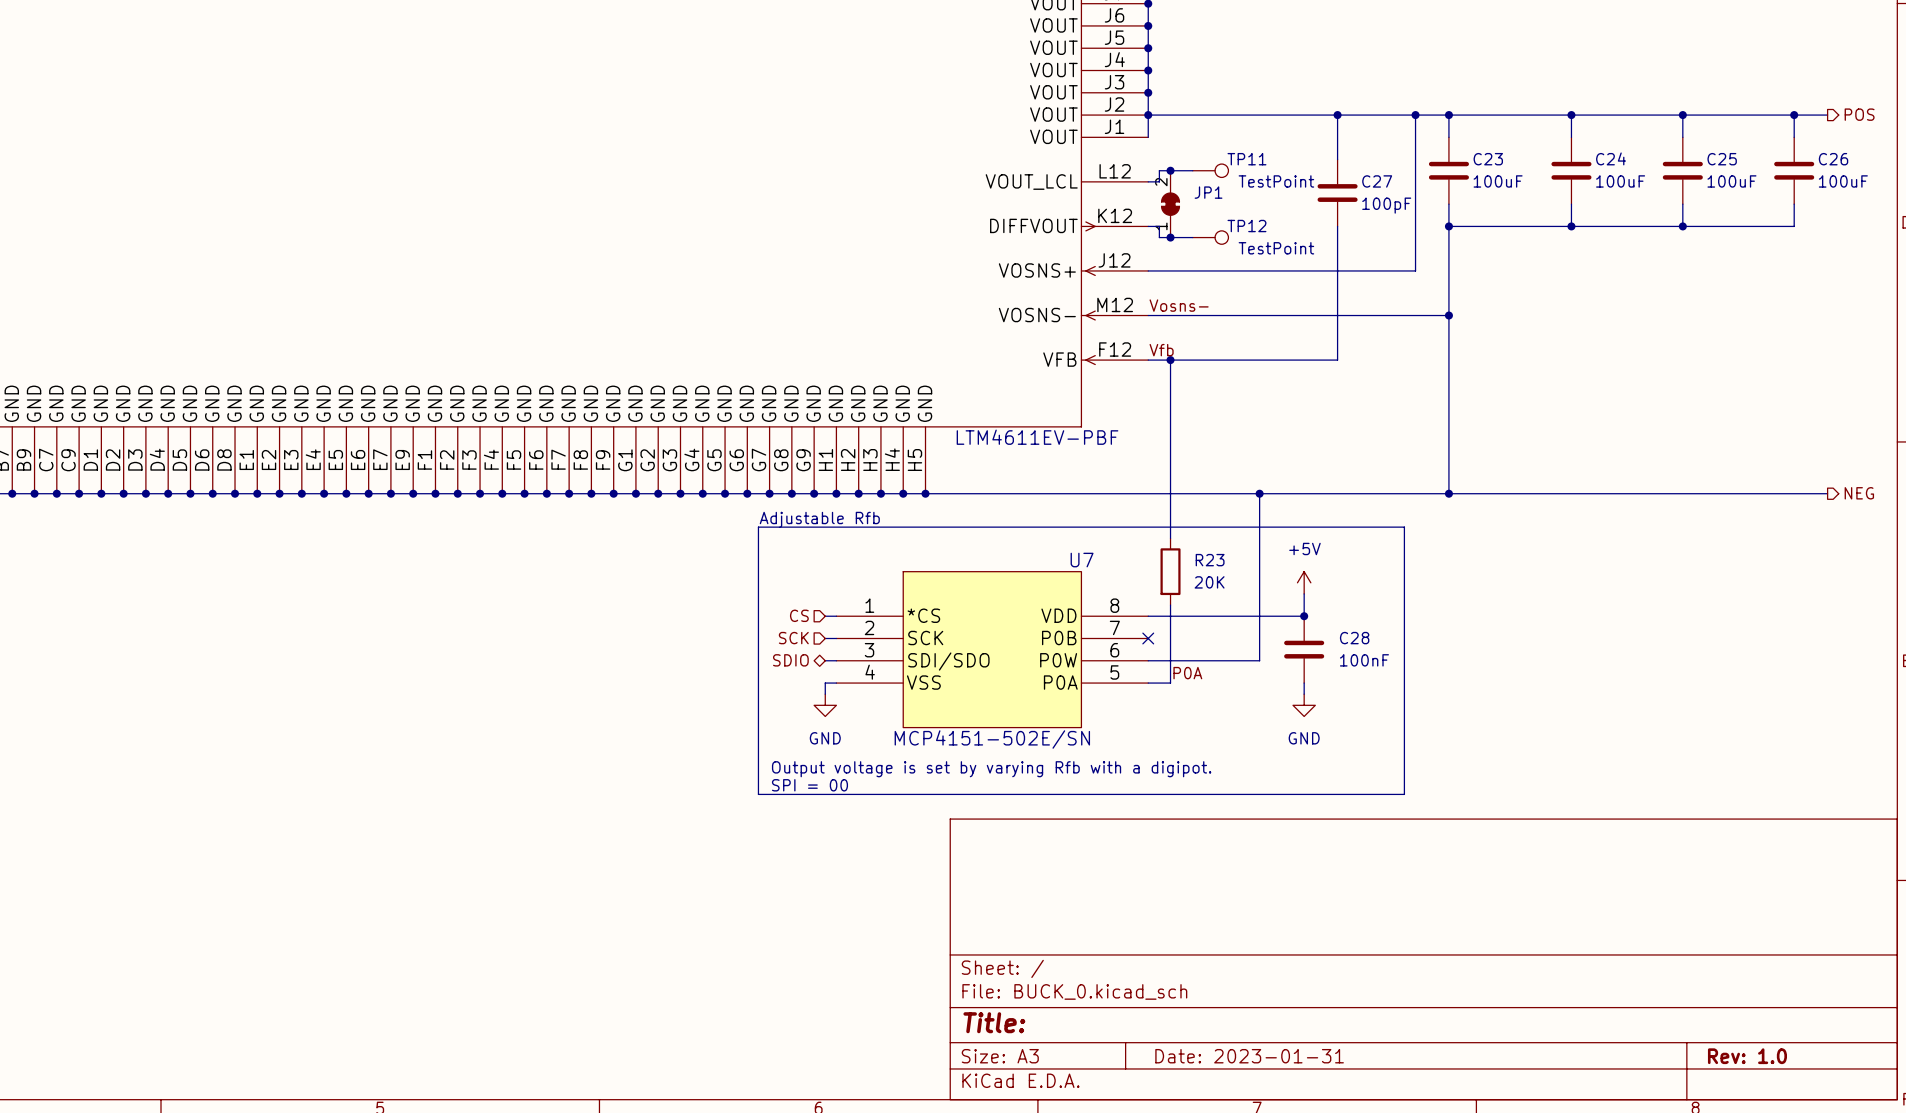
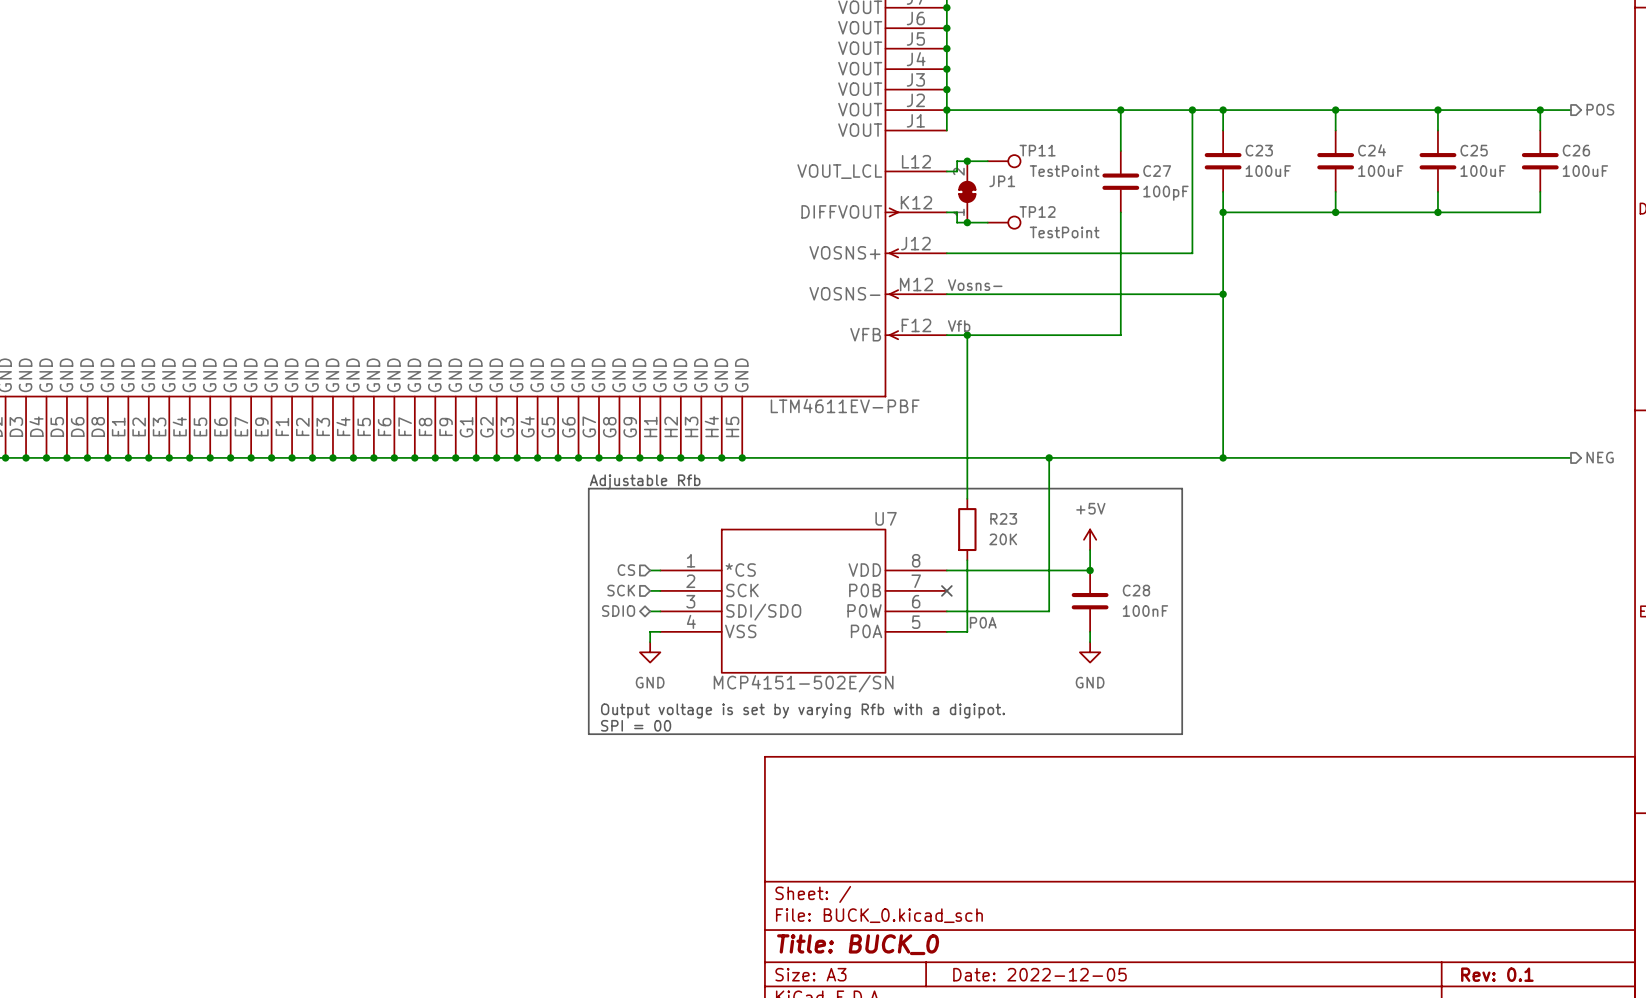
title block: Title: (994, 1022) -> Title: BUCK_0 (858, 944)
title block: Date: 2023-01-31 (1249, 1056) -> Date: 2022-12-05 (1039, 974)
title block: Rev: 1.0 (1747, 1056) -> Rev: 0.1 (1497, 974)

